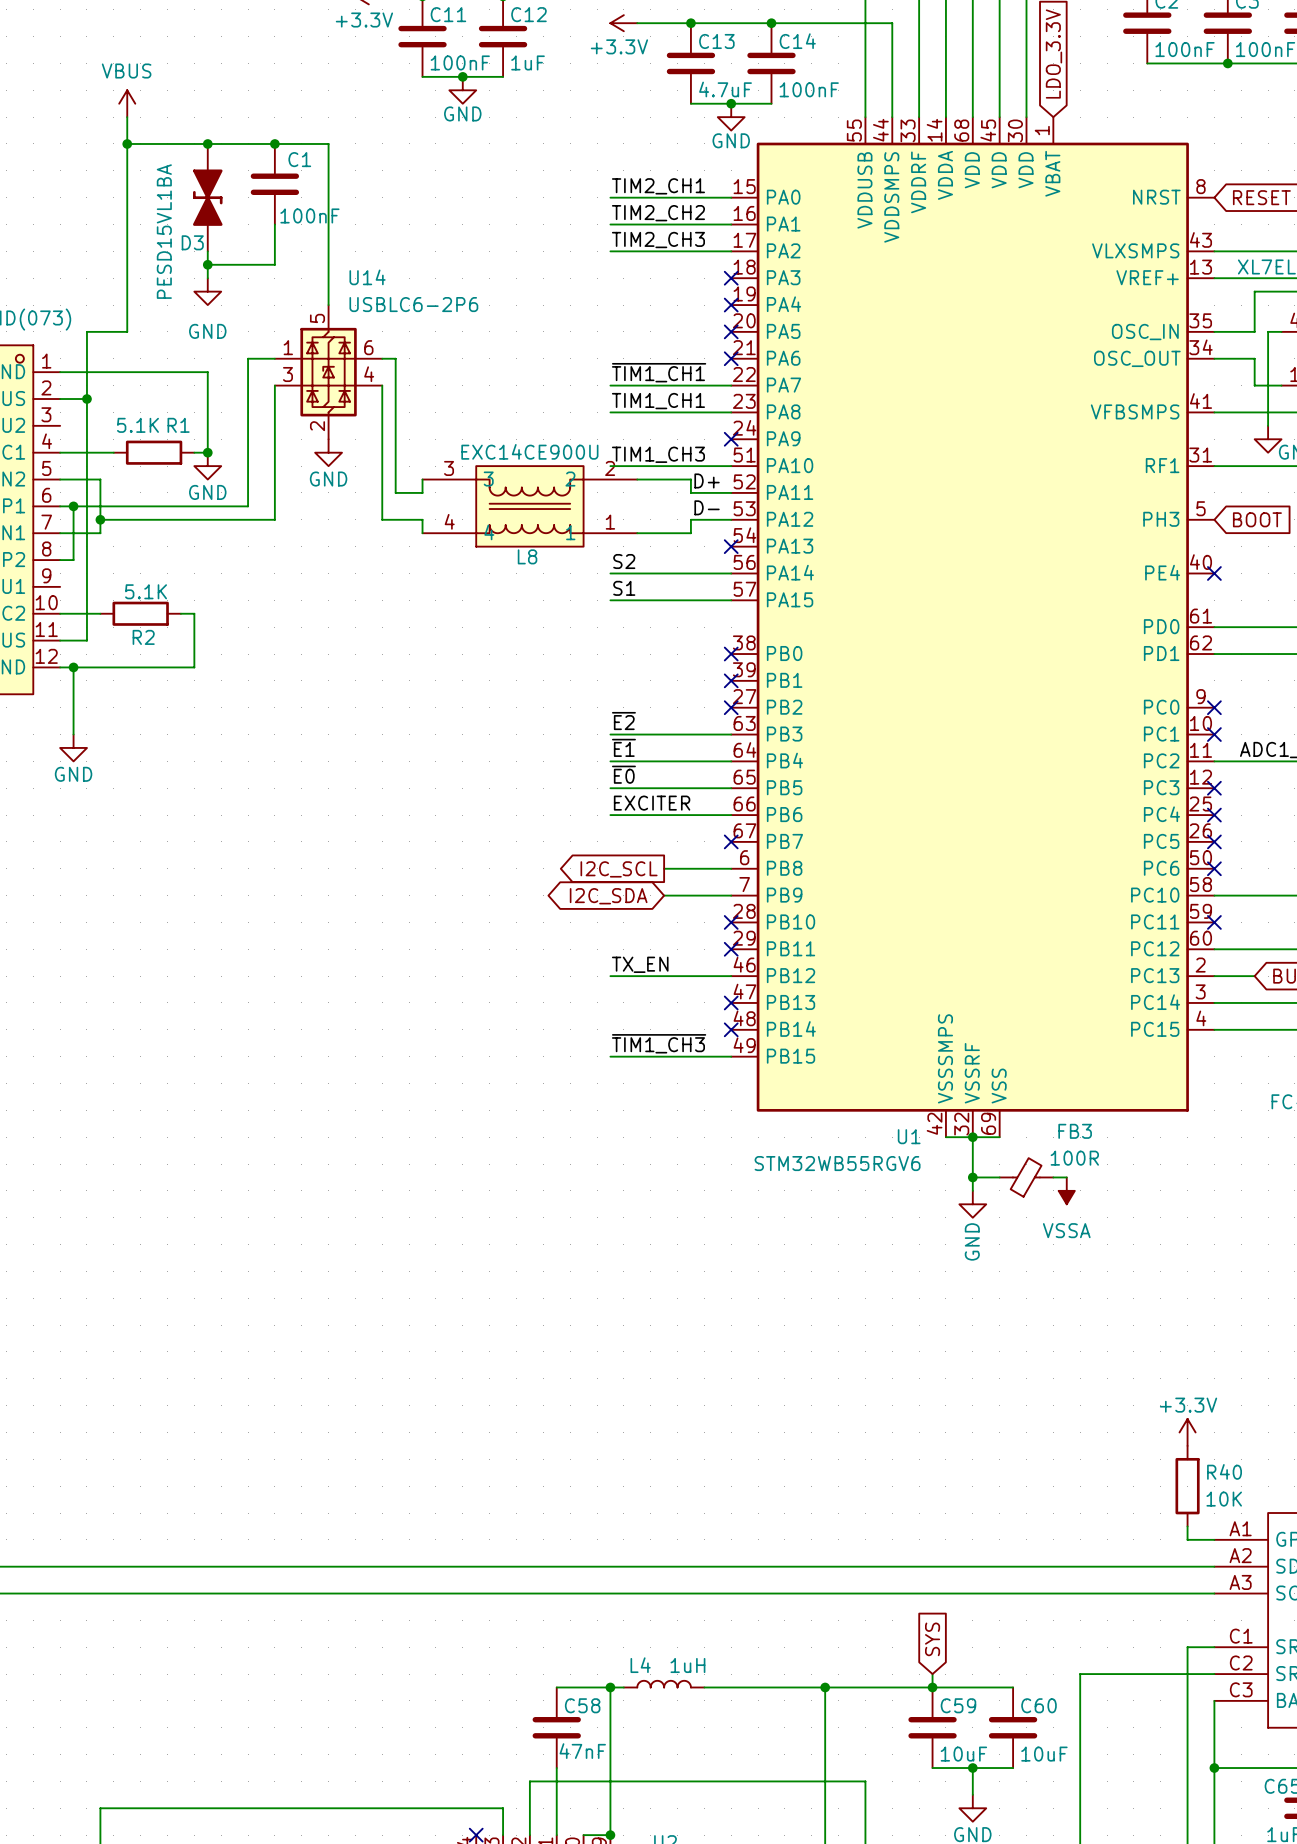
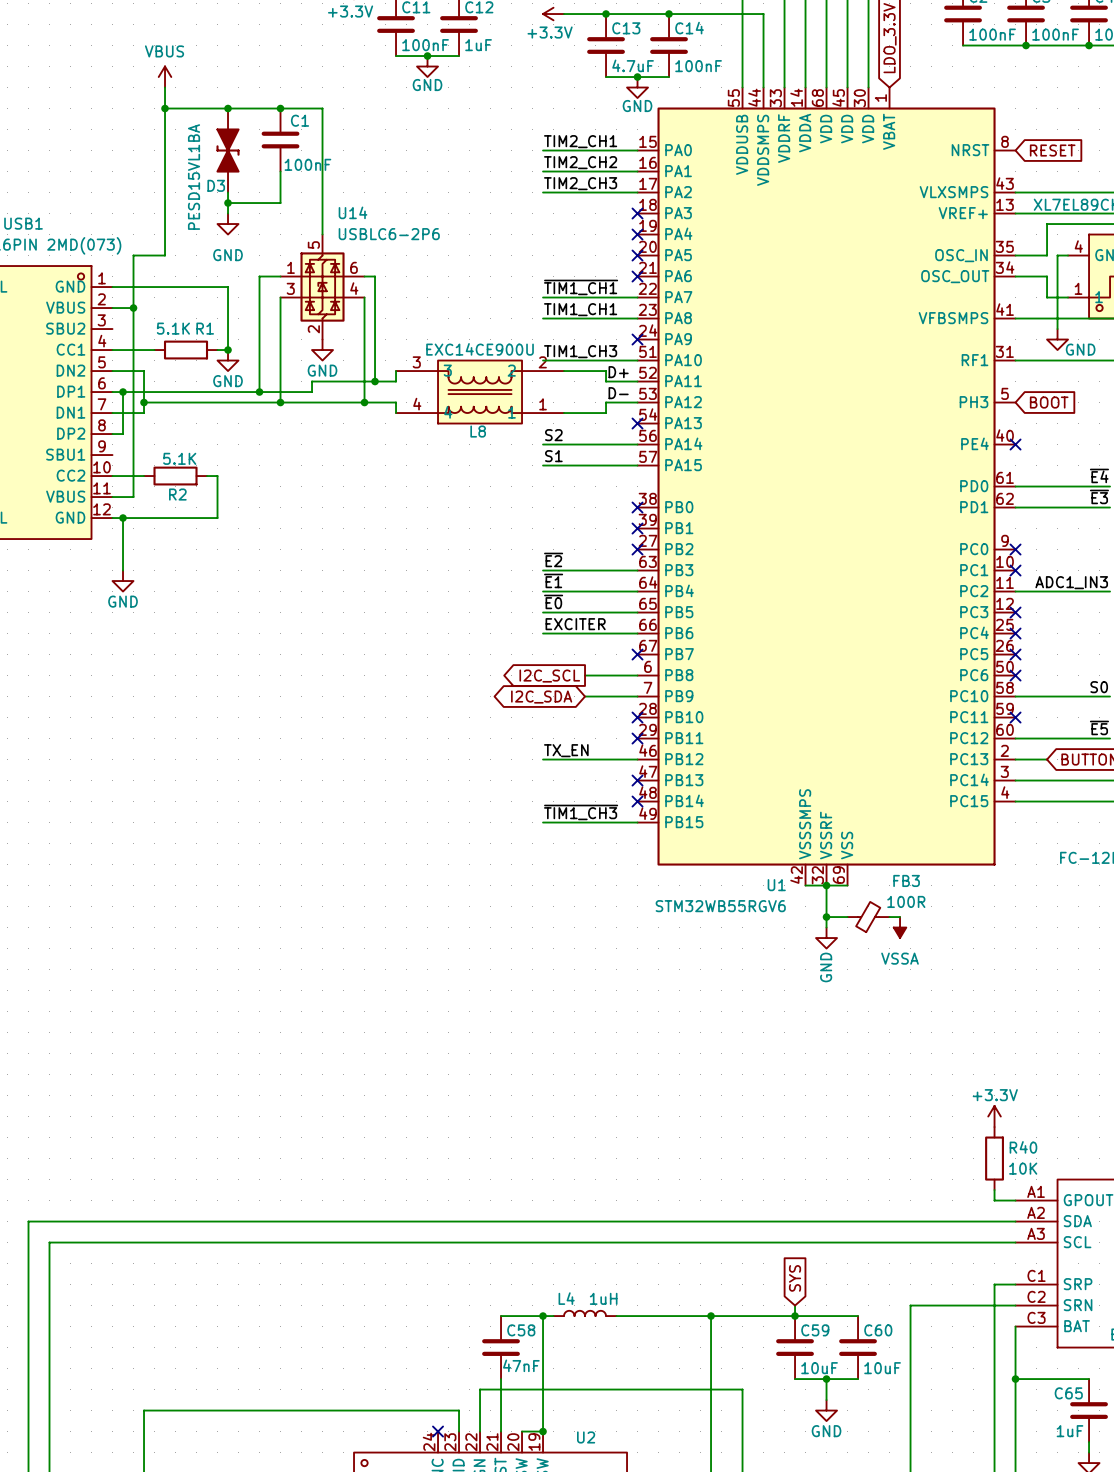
wire: none -> (375, 381) (312, 381) (312, 392) (259, 392)
junction: none -> (375, 381)
junction: none -> (259, 392)
wire: none -> (280, 402) (364, 402)
junction: none -> (280, 402)
junction: none -> (364, 402)

